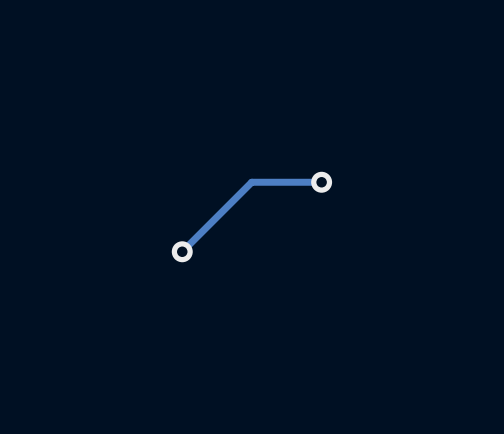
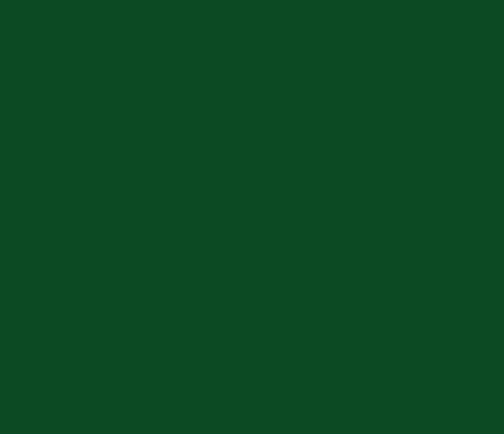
track: (321, 182) (251, 182) (182, 251) -> none
via: (321, 182) -> none
via: (182, 251) -> none

